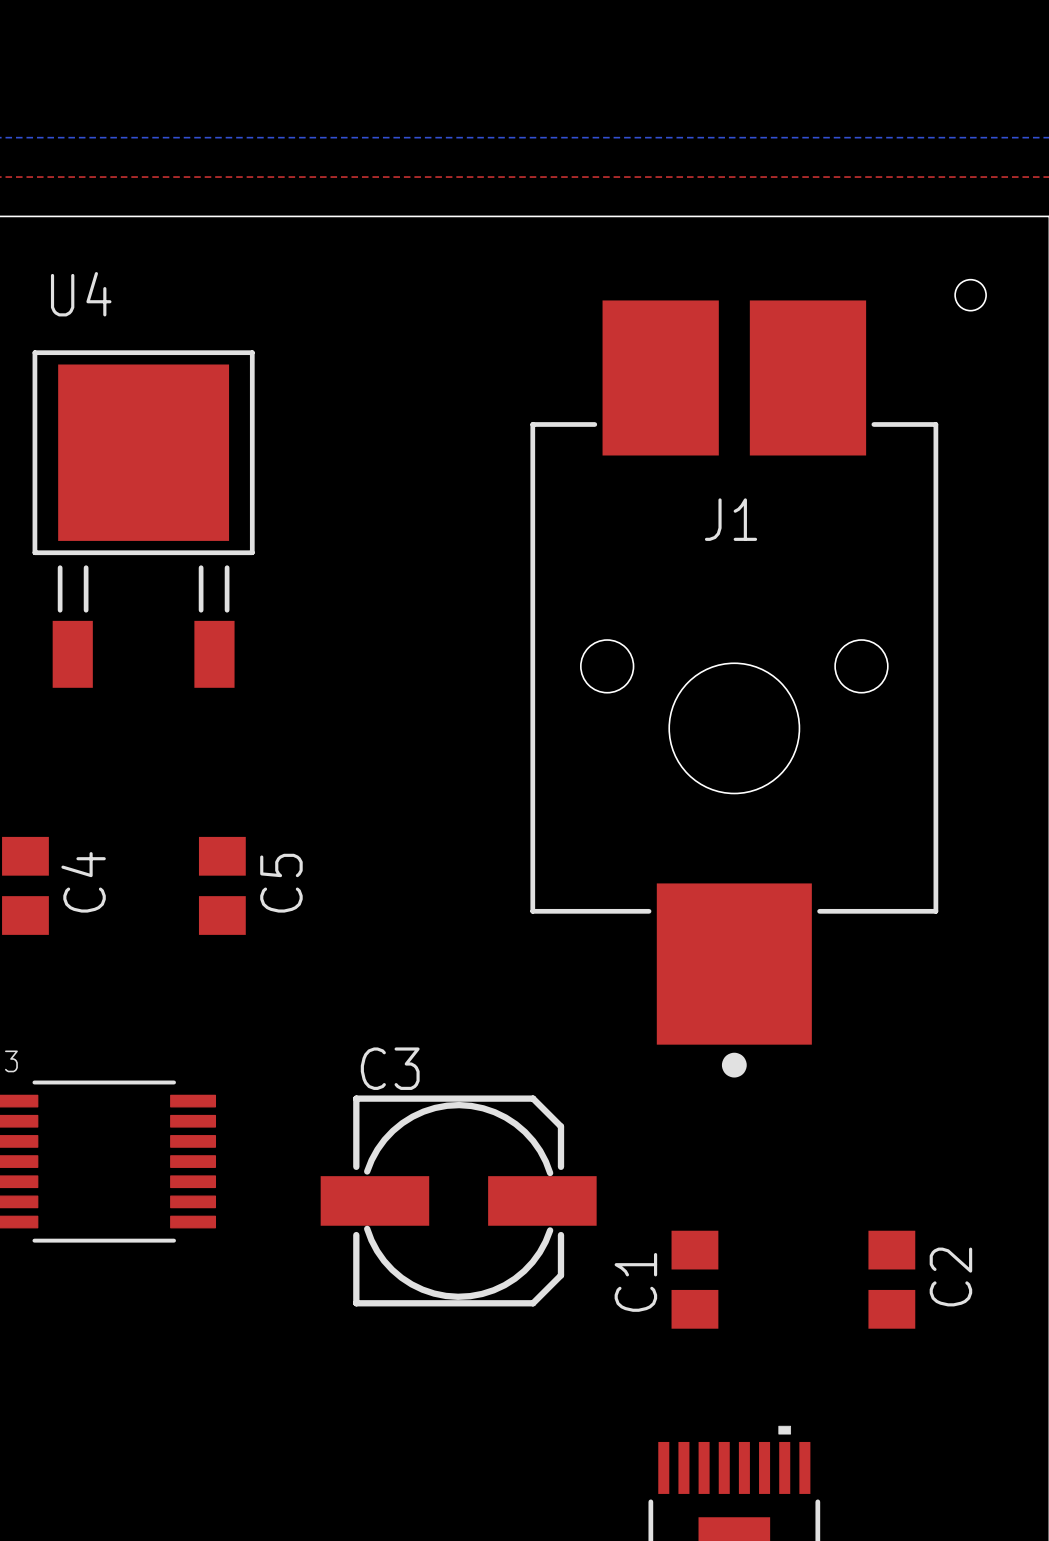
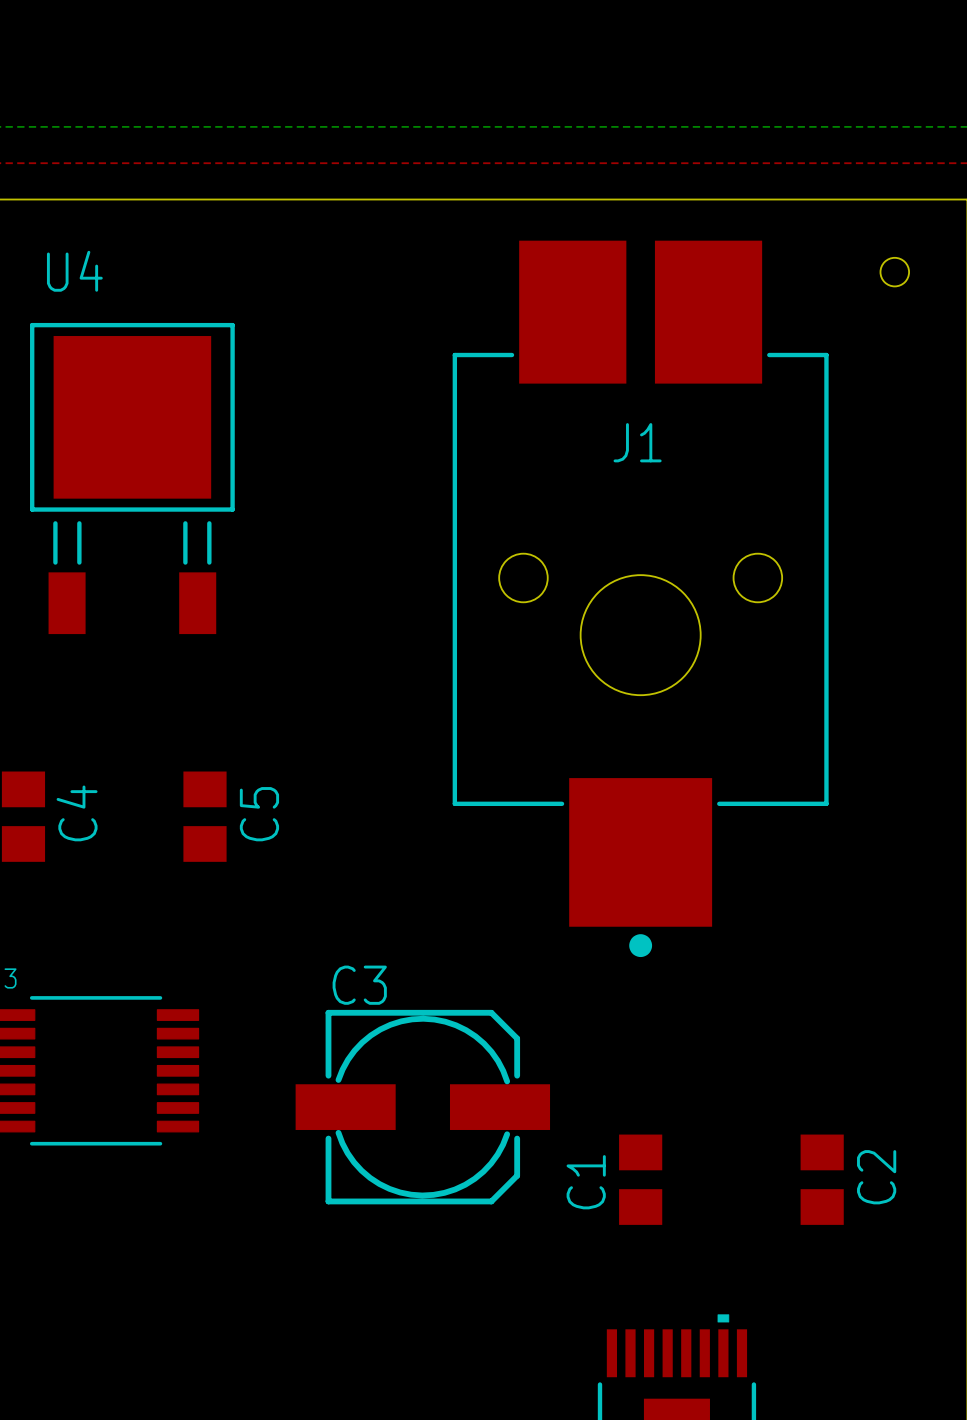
J1 position: (734, 688) -> (640, 598)

